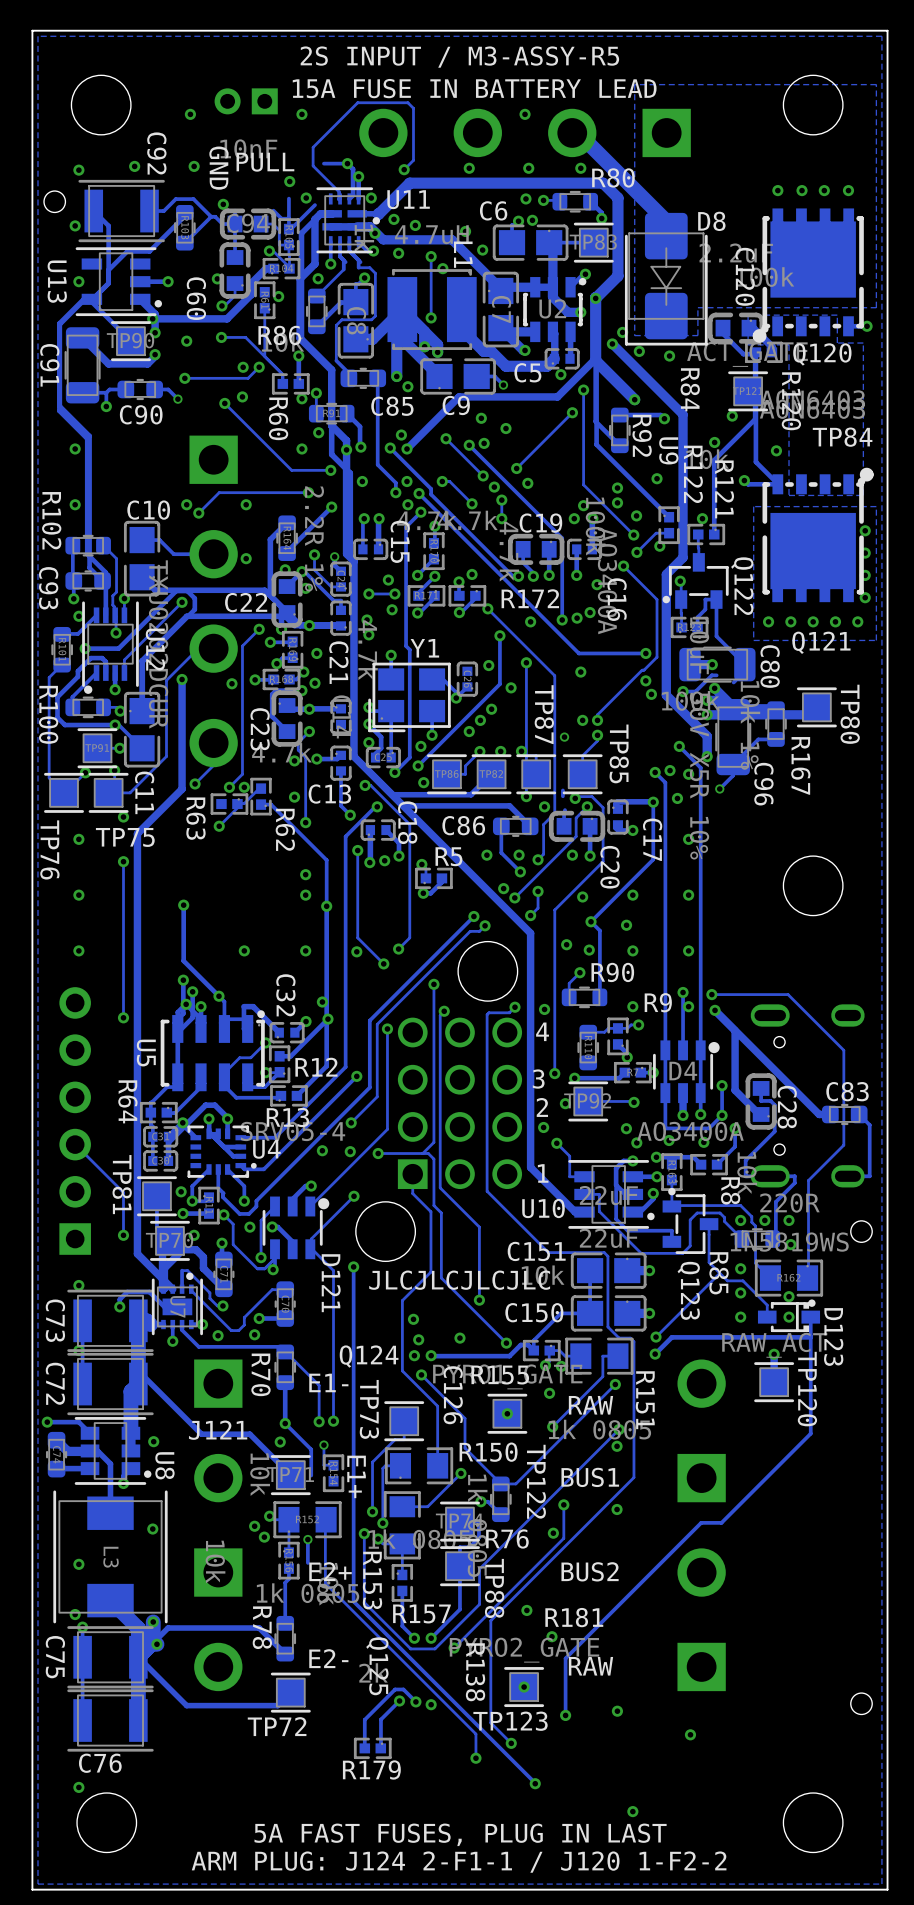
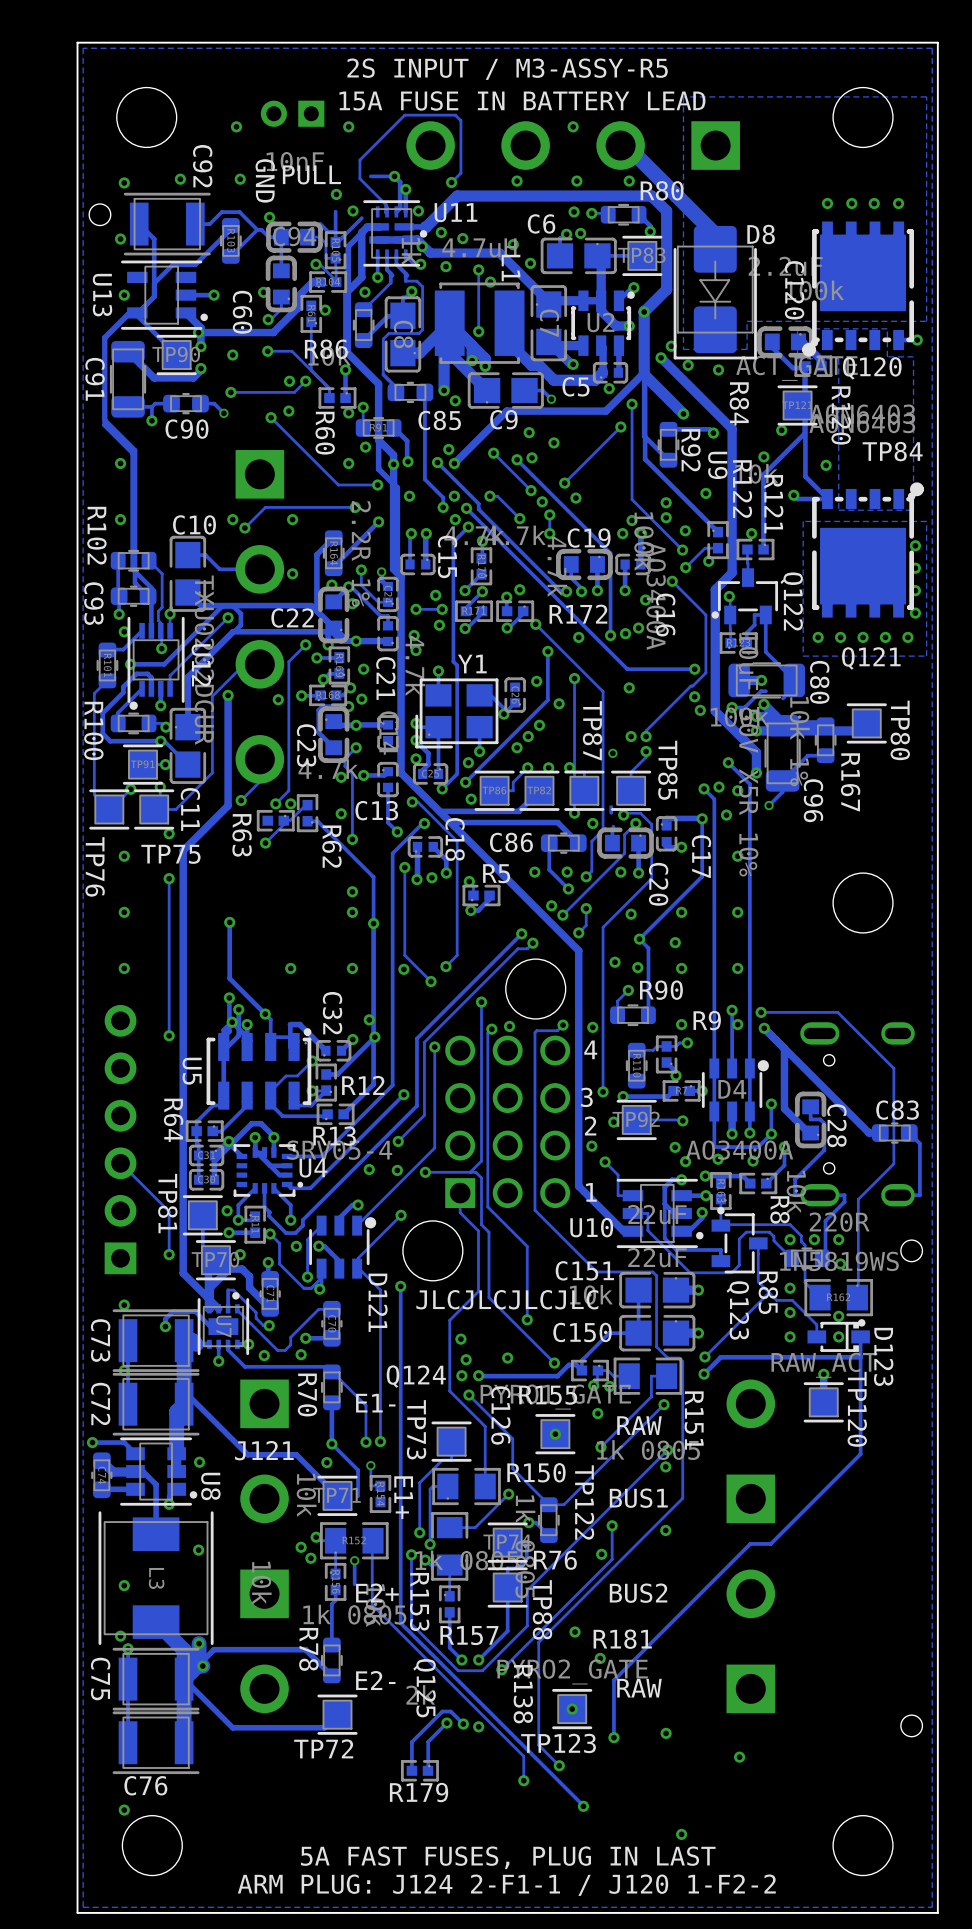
via: none -> (509, 1026)

